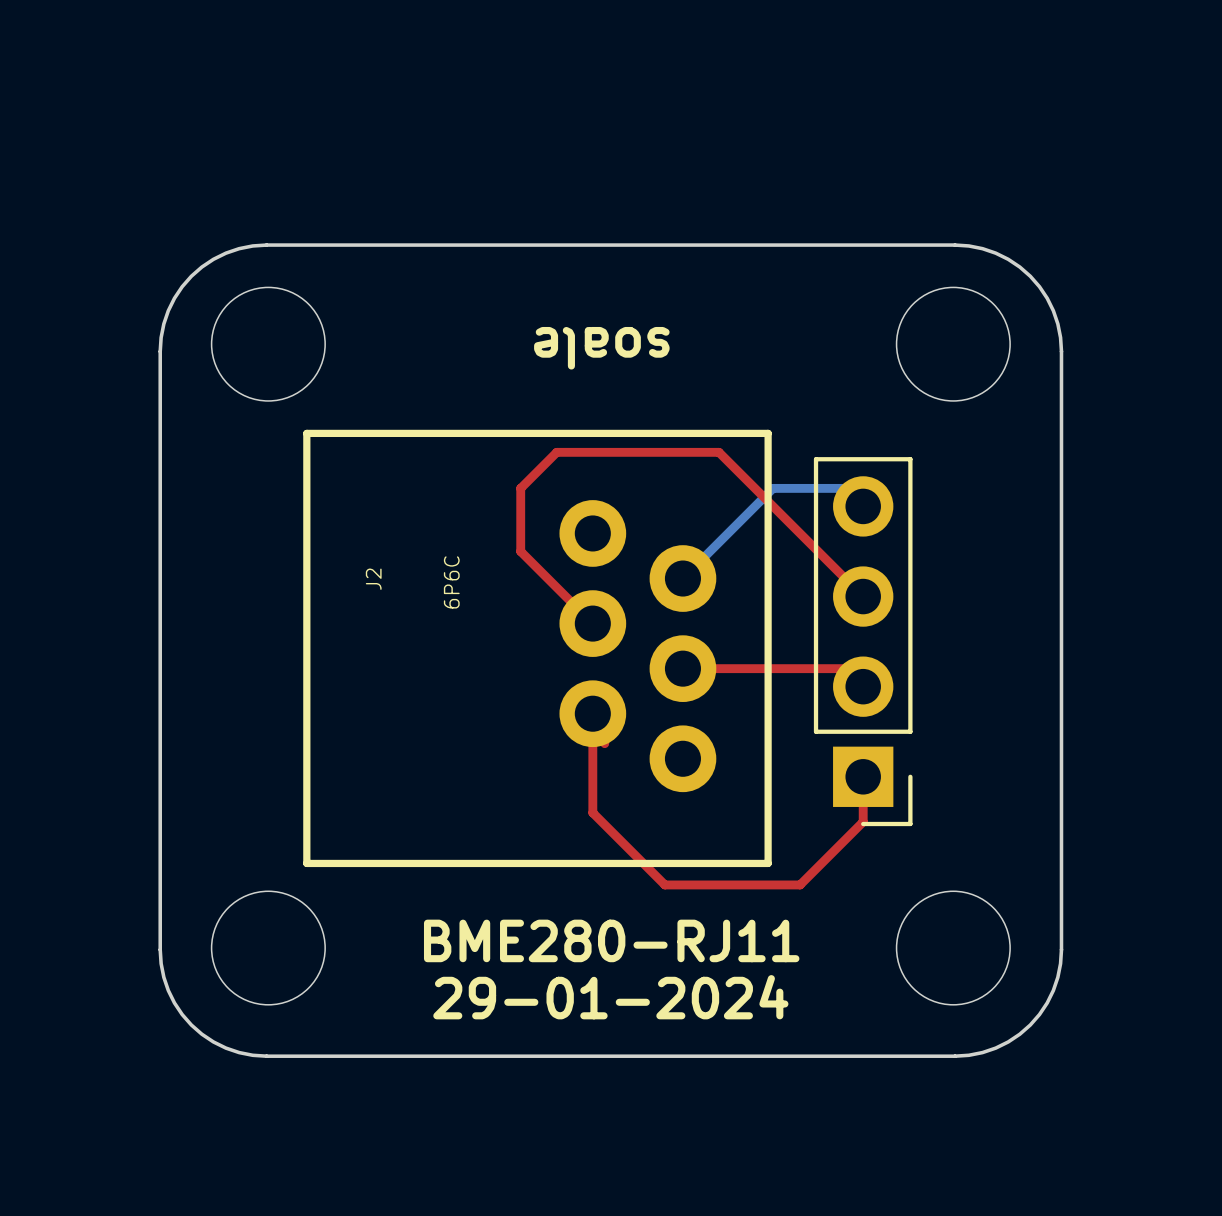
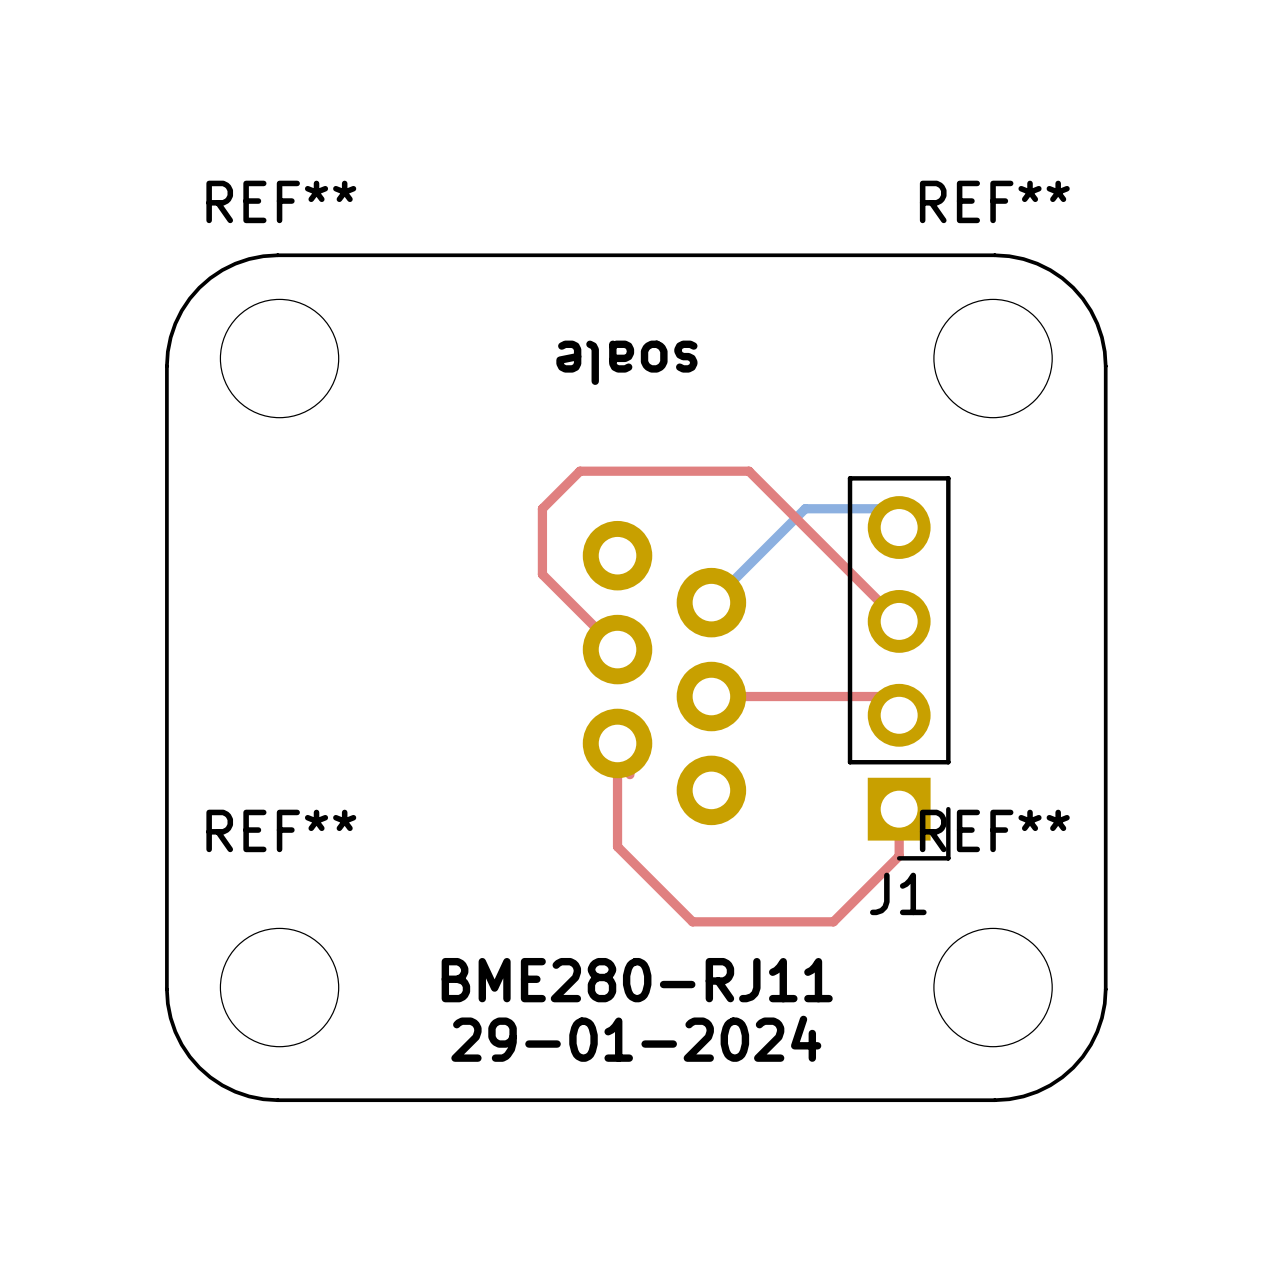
REF** name: none -> REF** (281, 201)
REF** name: none -> REF** (994, 201)
J2: 6P6C (537, 648) -> none
REF** name: none -> REF** (281, 830)
REF** name: none -> REF** (994, 830)
J1 name: none -> J1 (898, 893)

